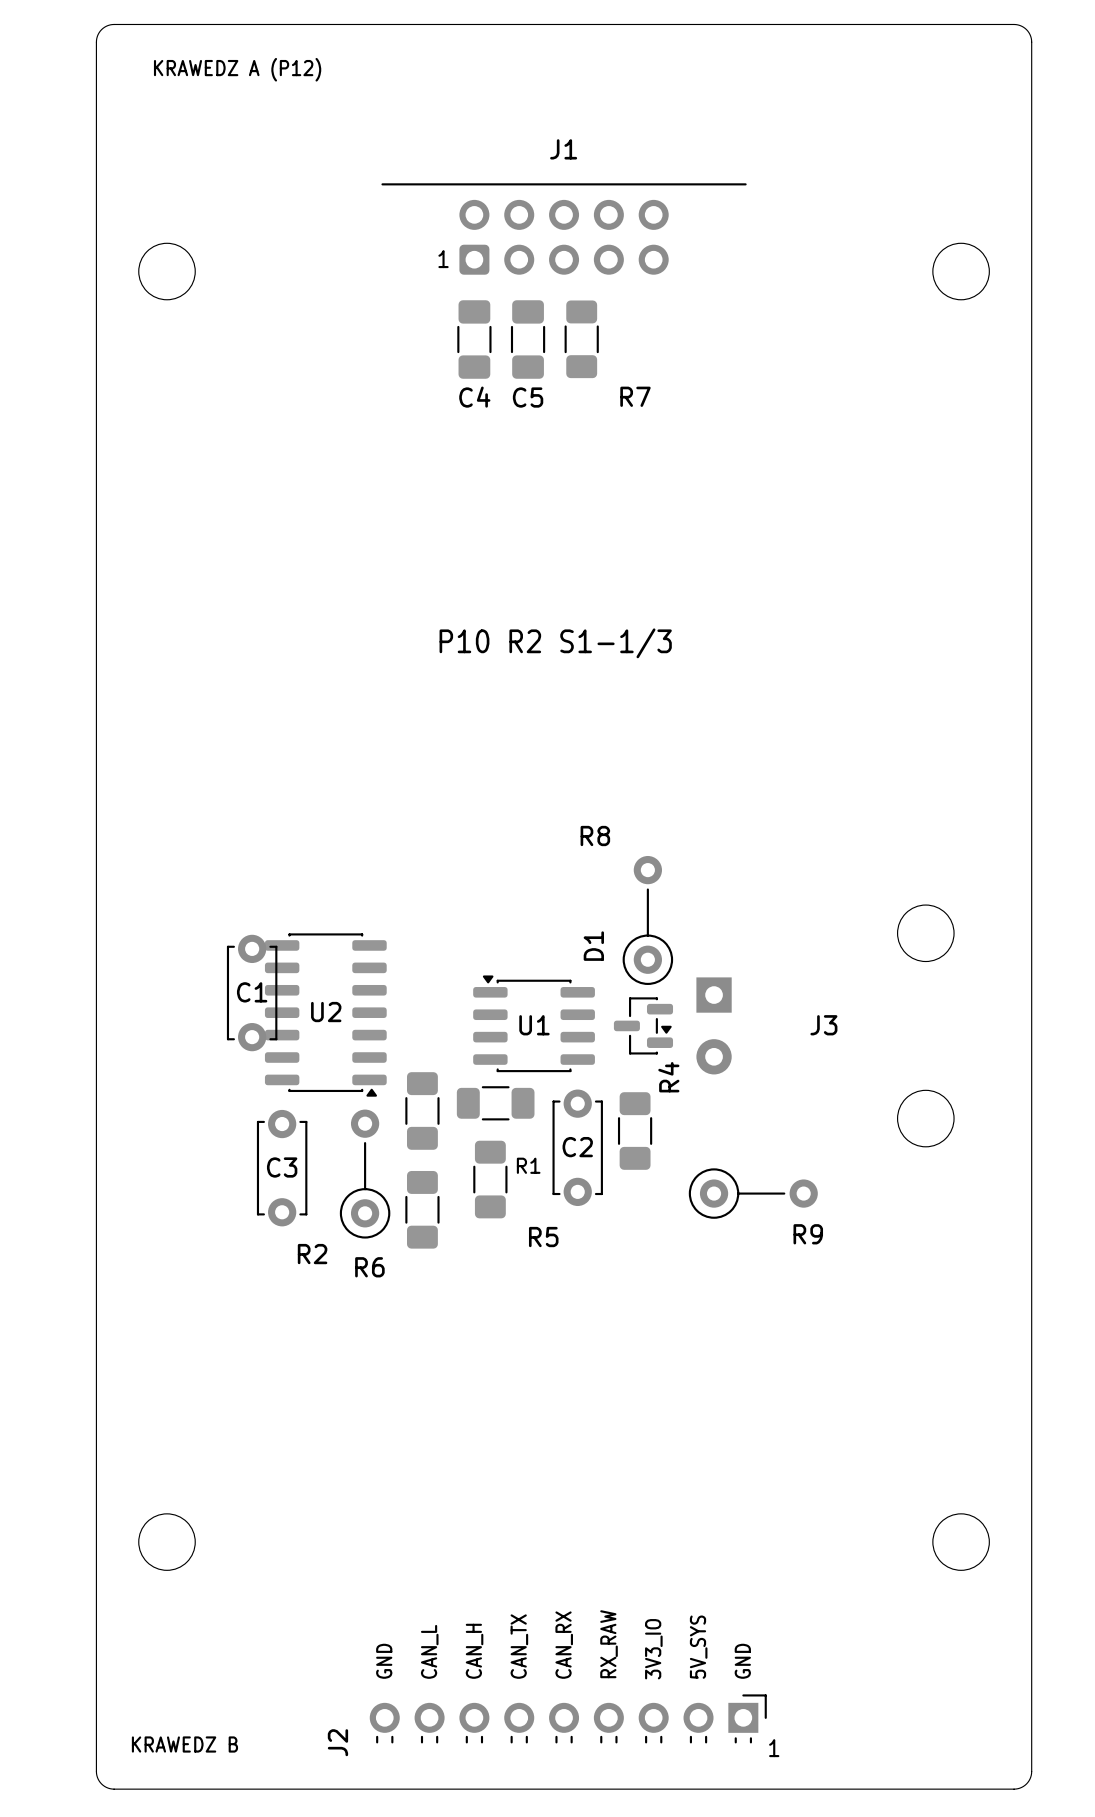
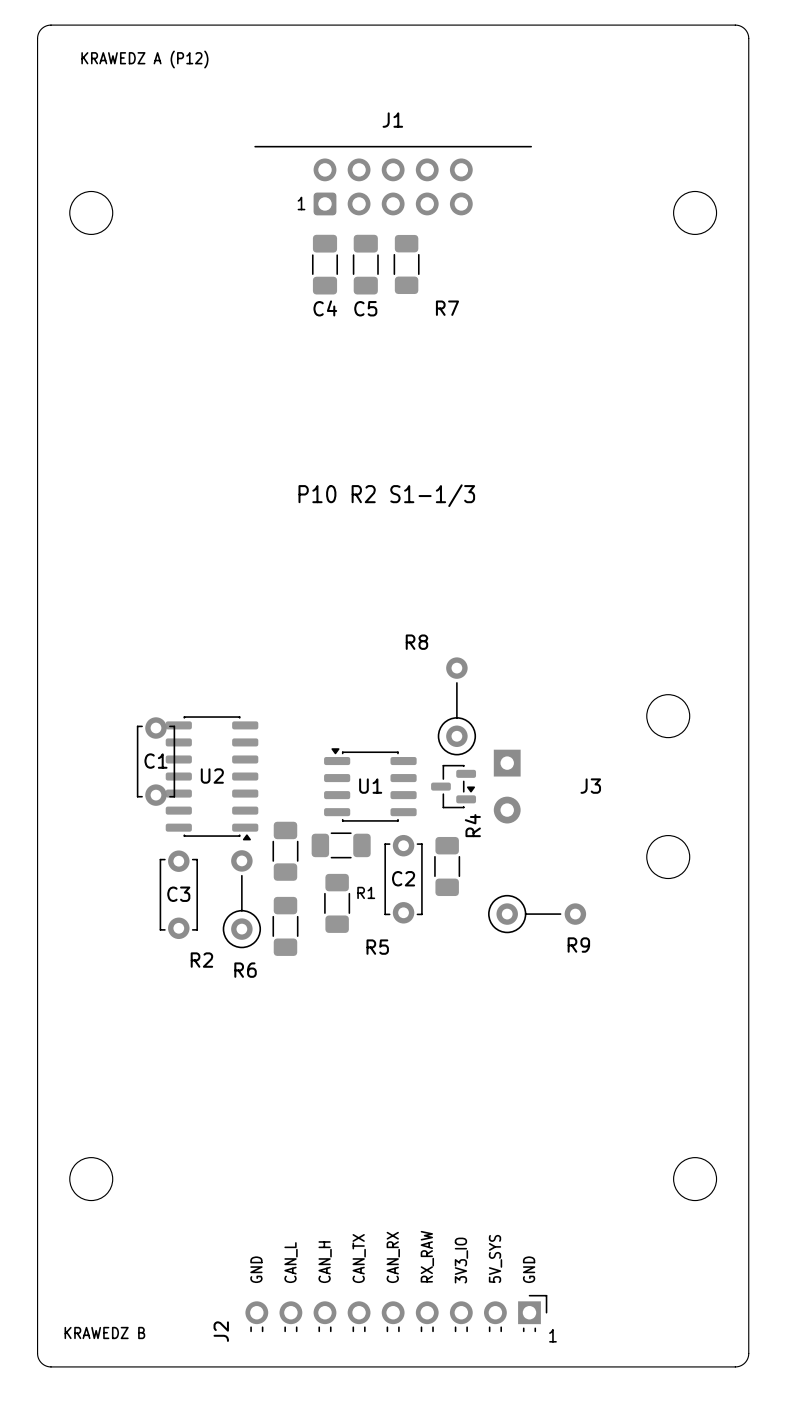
D1 name: D1 (593, 946) -> none

